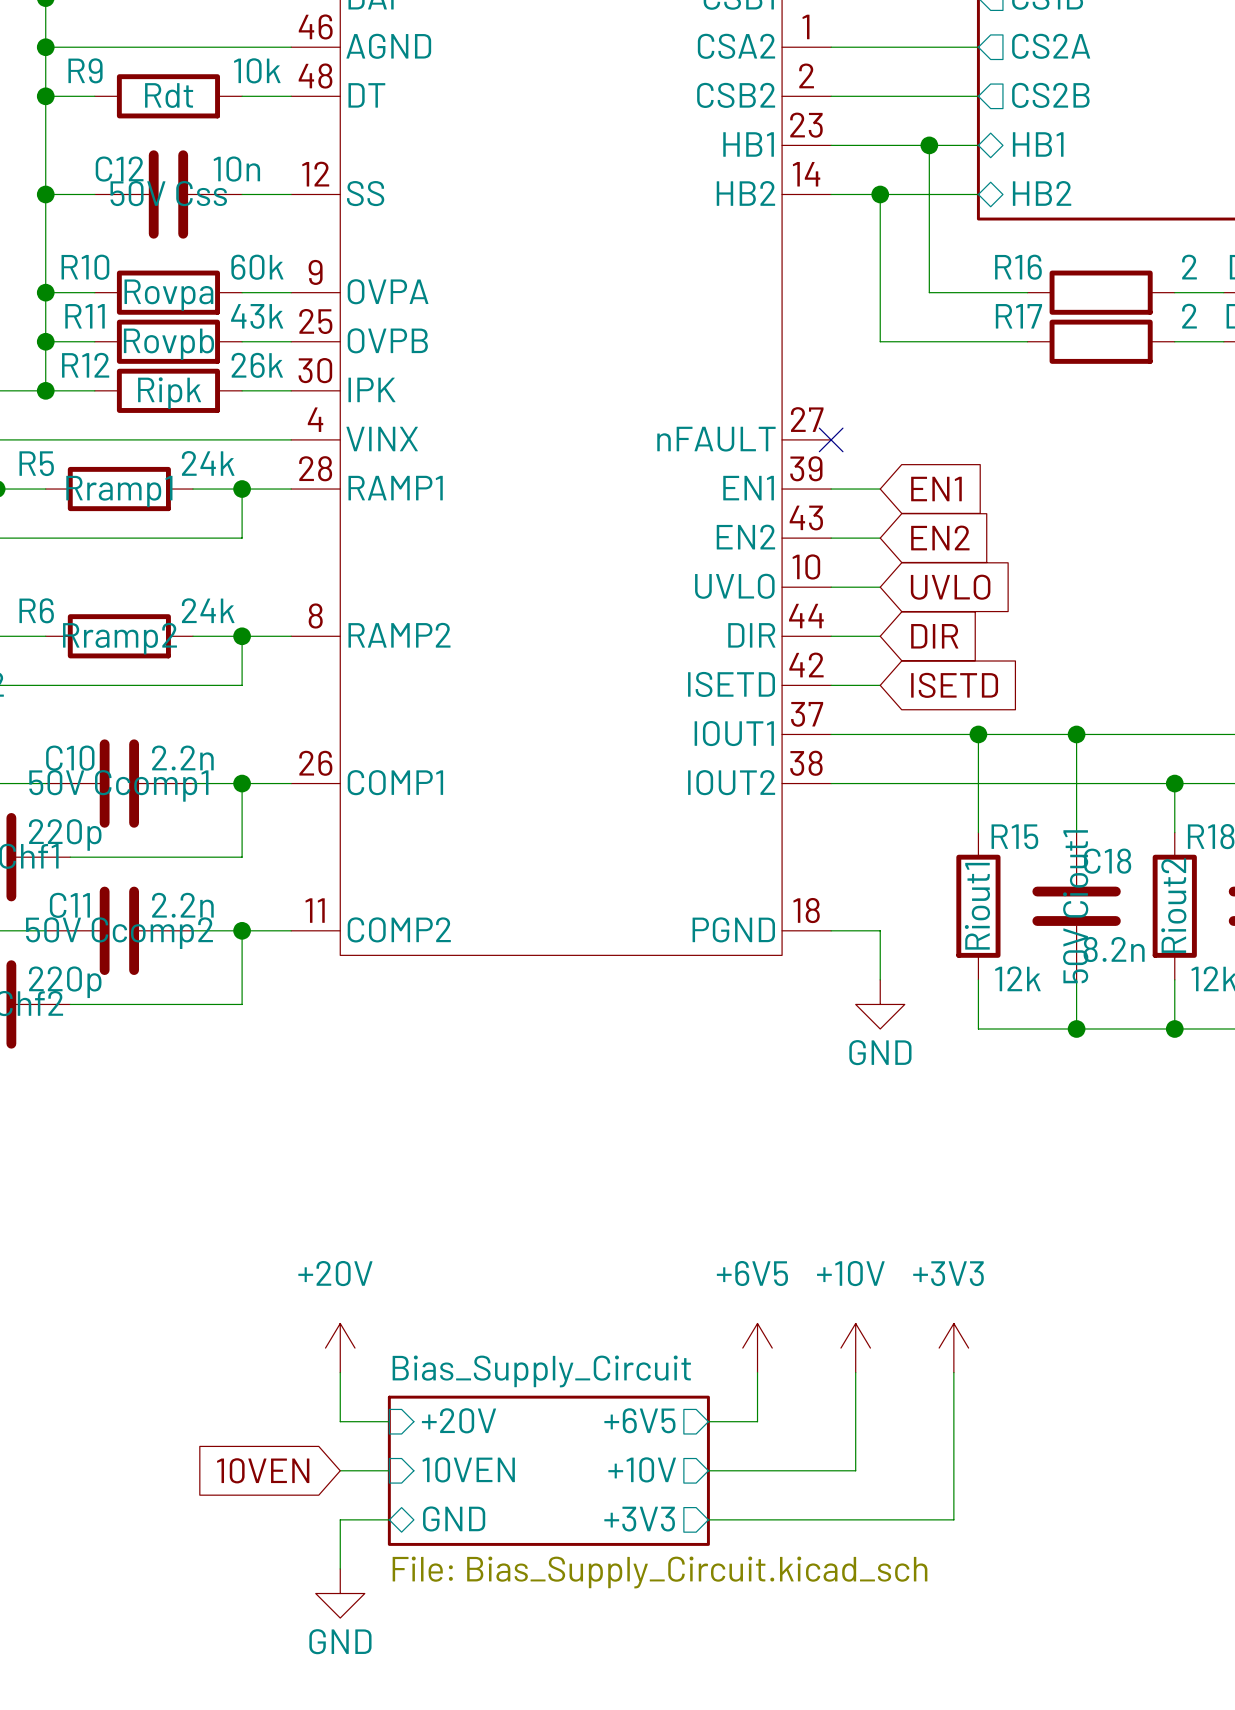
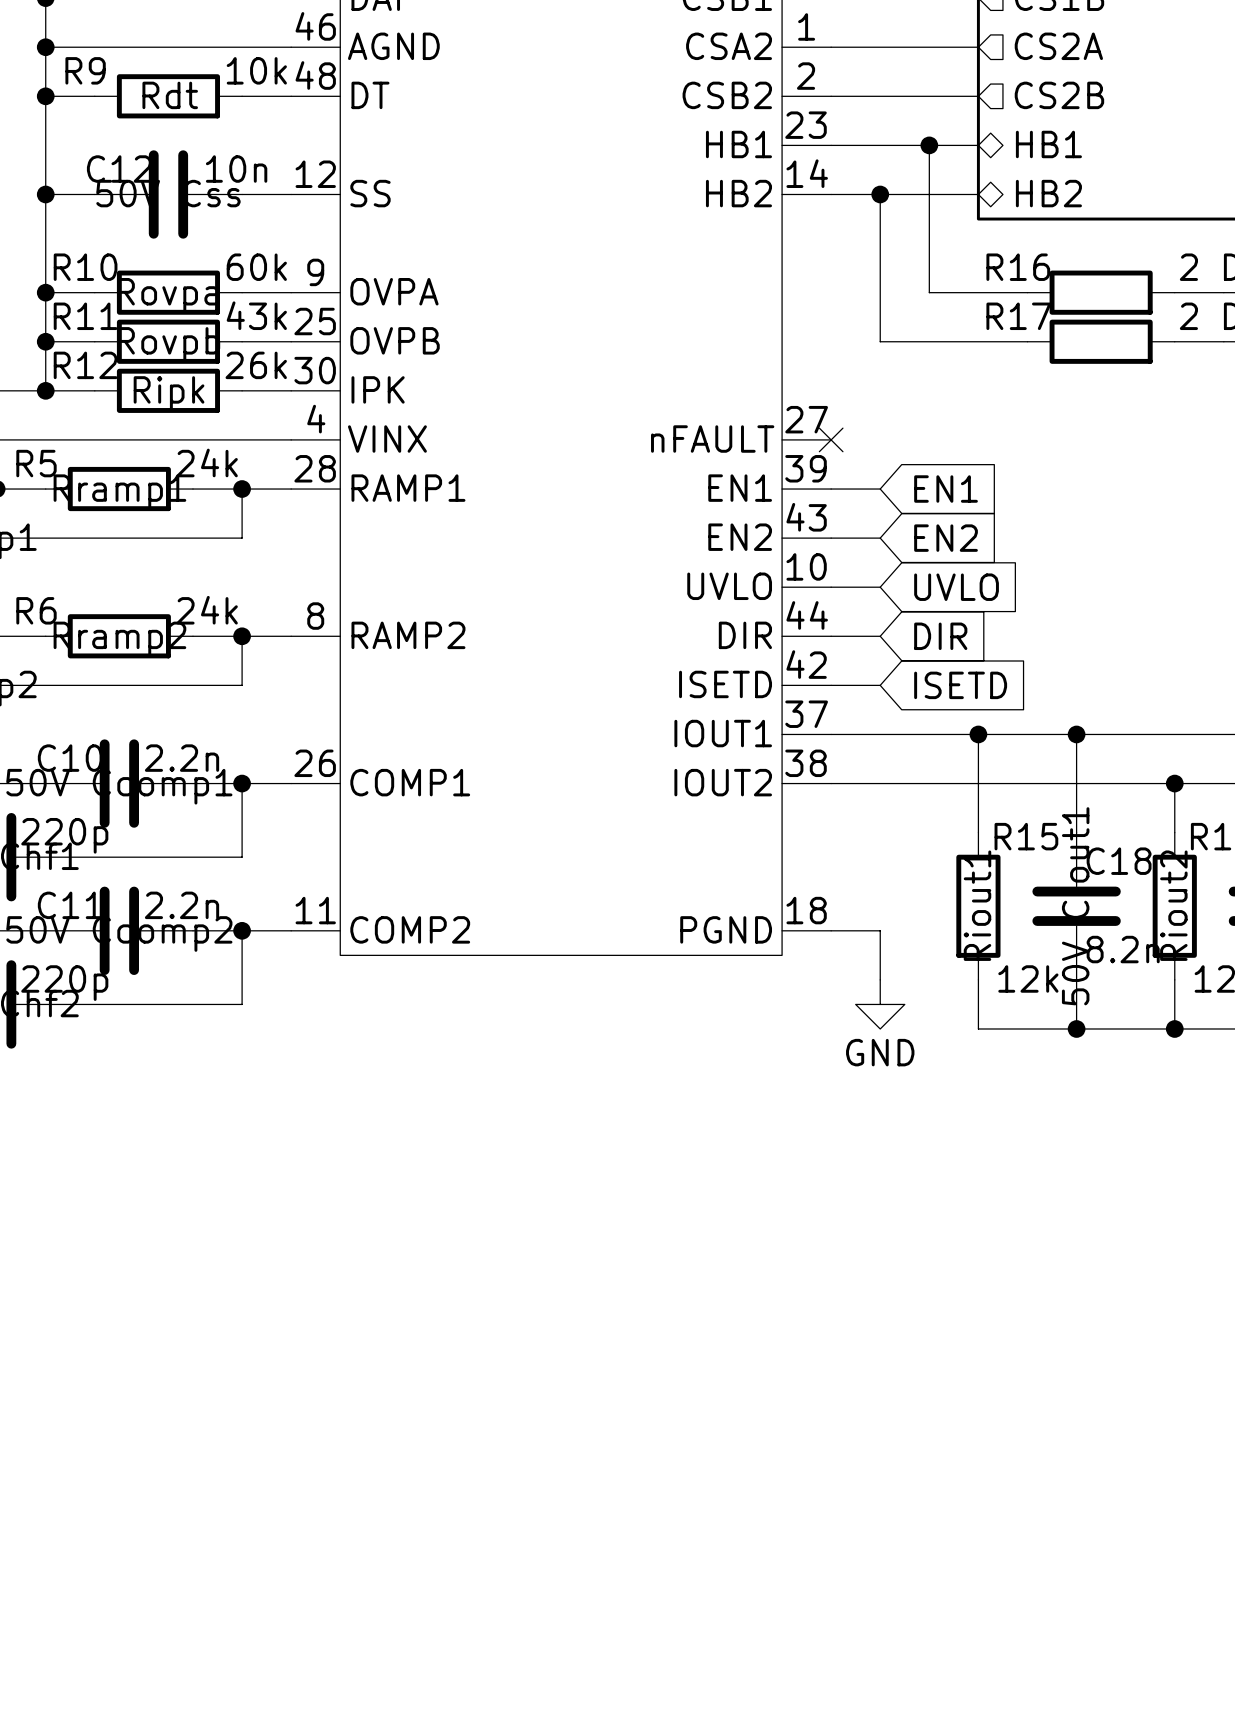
power symbol: +20V (340, 1348) -> none
power symbol: +6V5 (757, 1348) -> none
power symbol: +10V (855, 1348) -> none
power symbol: +3V3 (953, 1348) -> none
wire: (340, 1372) (340, 1421) (389, 1421) -> none
wire: (757, 1372) (757, 1421) (708, 1421) -> none
wire: (855, 1372) (855, 1470) (708, 1470) -> none
wire: (953, 1372) (953, 1519) (708, 1519) -> none
sheet pin: +20V (459, 1420) -> none
sheet pin: +6V5 (639, 1420) -> none
sheet pin: 10VEN (468, 1469) -> none
sheet pin: +10V (642, 1469) -> none
global label: 10VEN (263, 1470) -> none
wire: (340, 1470) (389, 1470) -> none
sheet Bias_Supply_Circuit: File: Bias_Supply_Circuit.kicad_sch (548, 1470) -> none
sheet pin: GND (454, 1518) -> none
wire: (389, 1519) (340, 1519) (340, 1568) -> none
sheet pin: +3V3 (639, 1519) -> none
power symbol: GND (340, 1593) -> none

